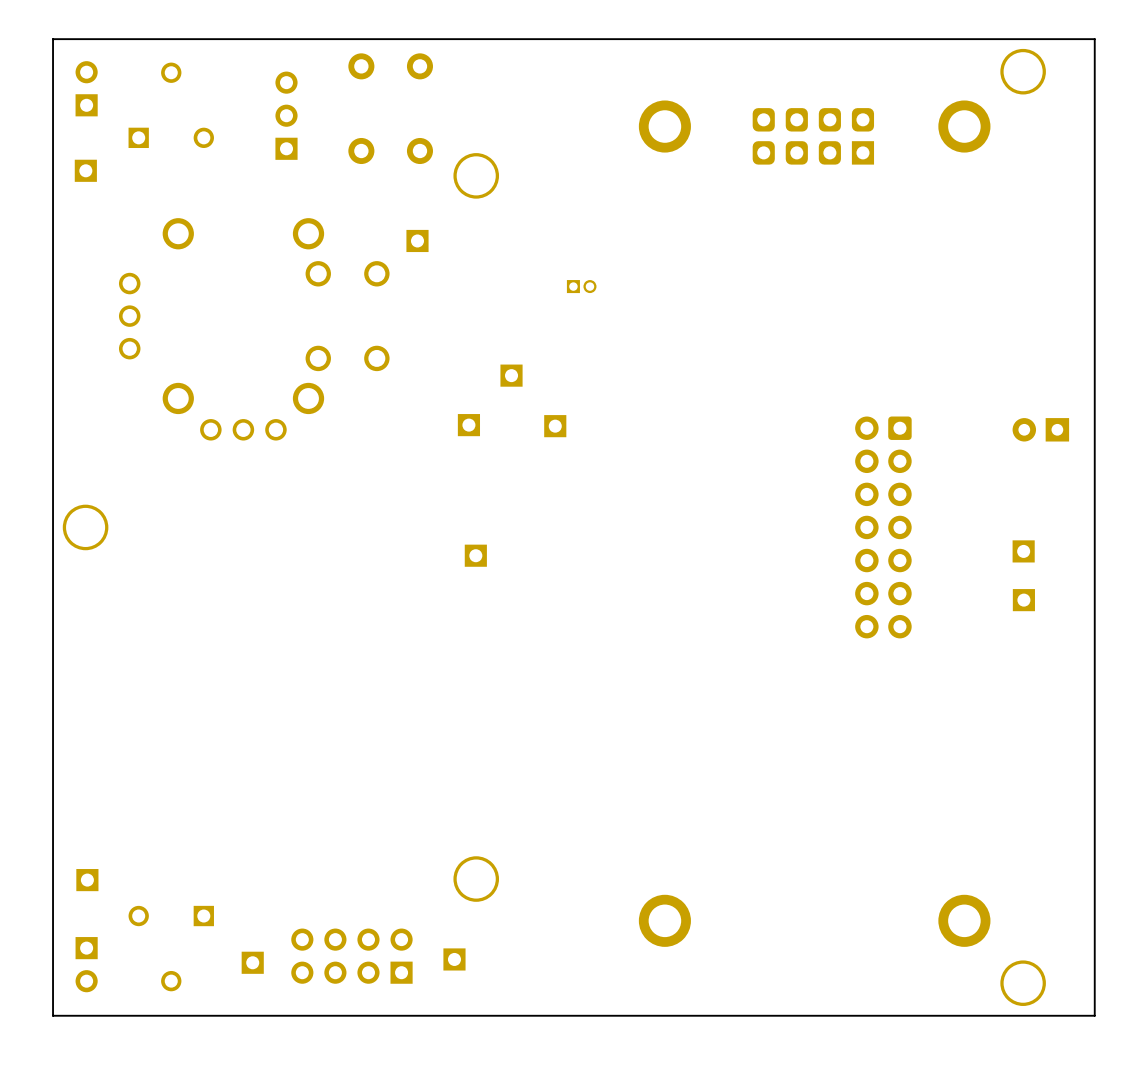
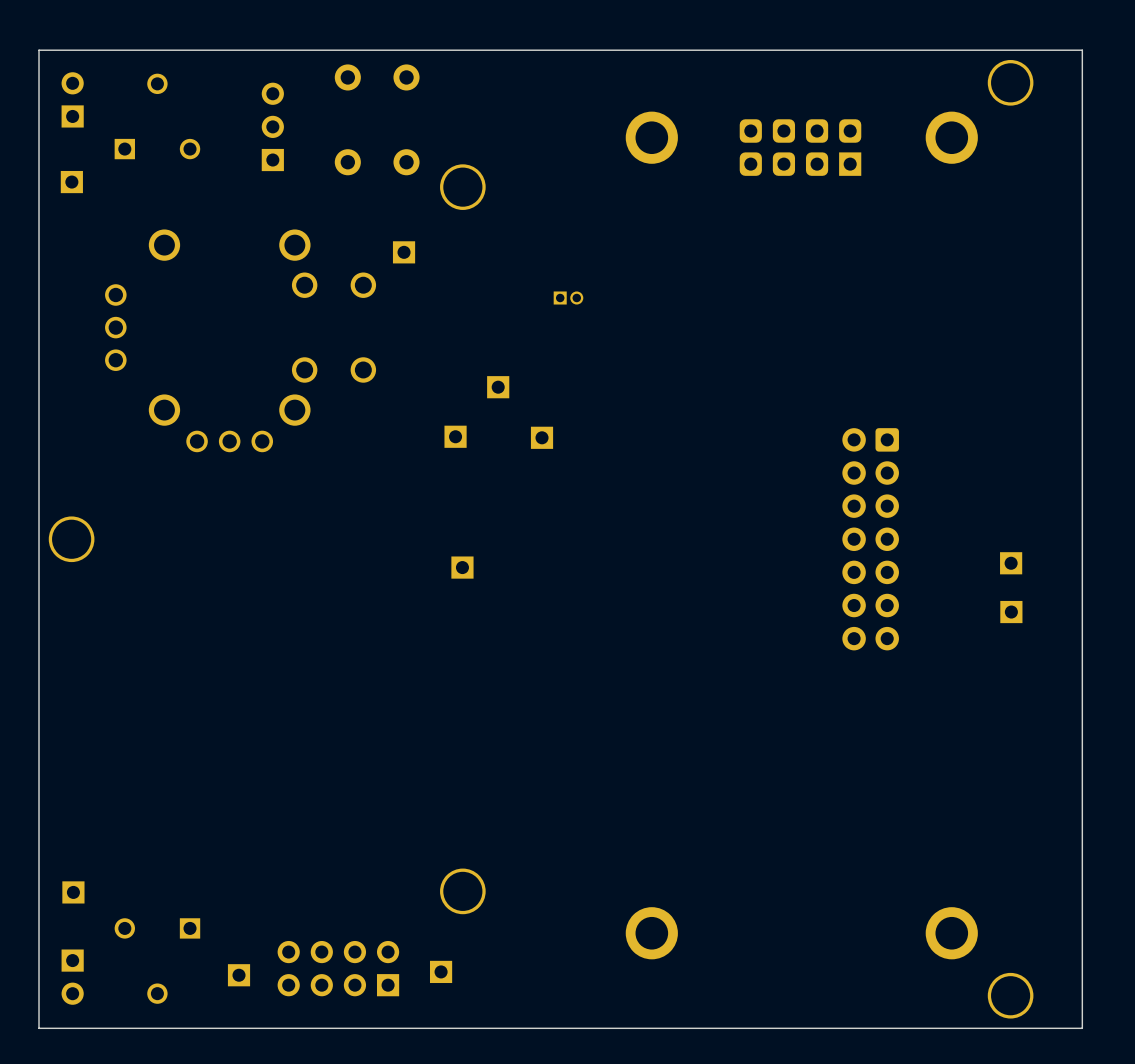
part: (1040, 429) -> none

